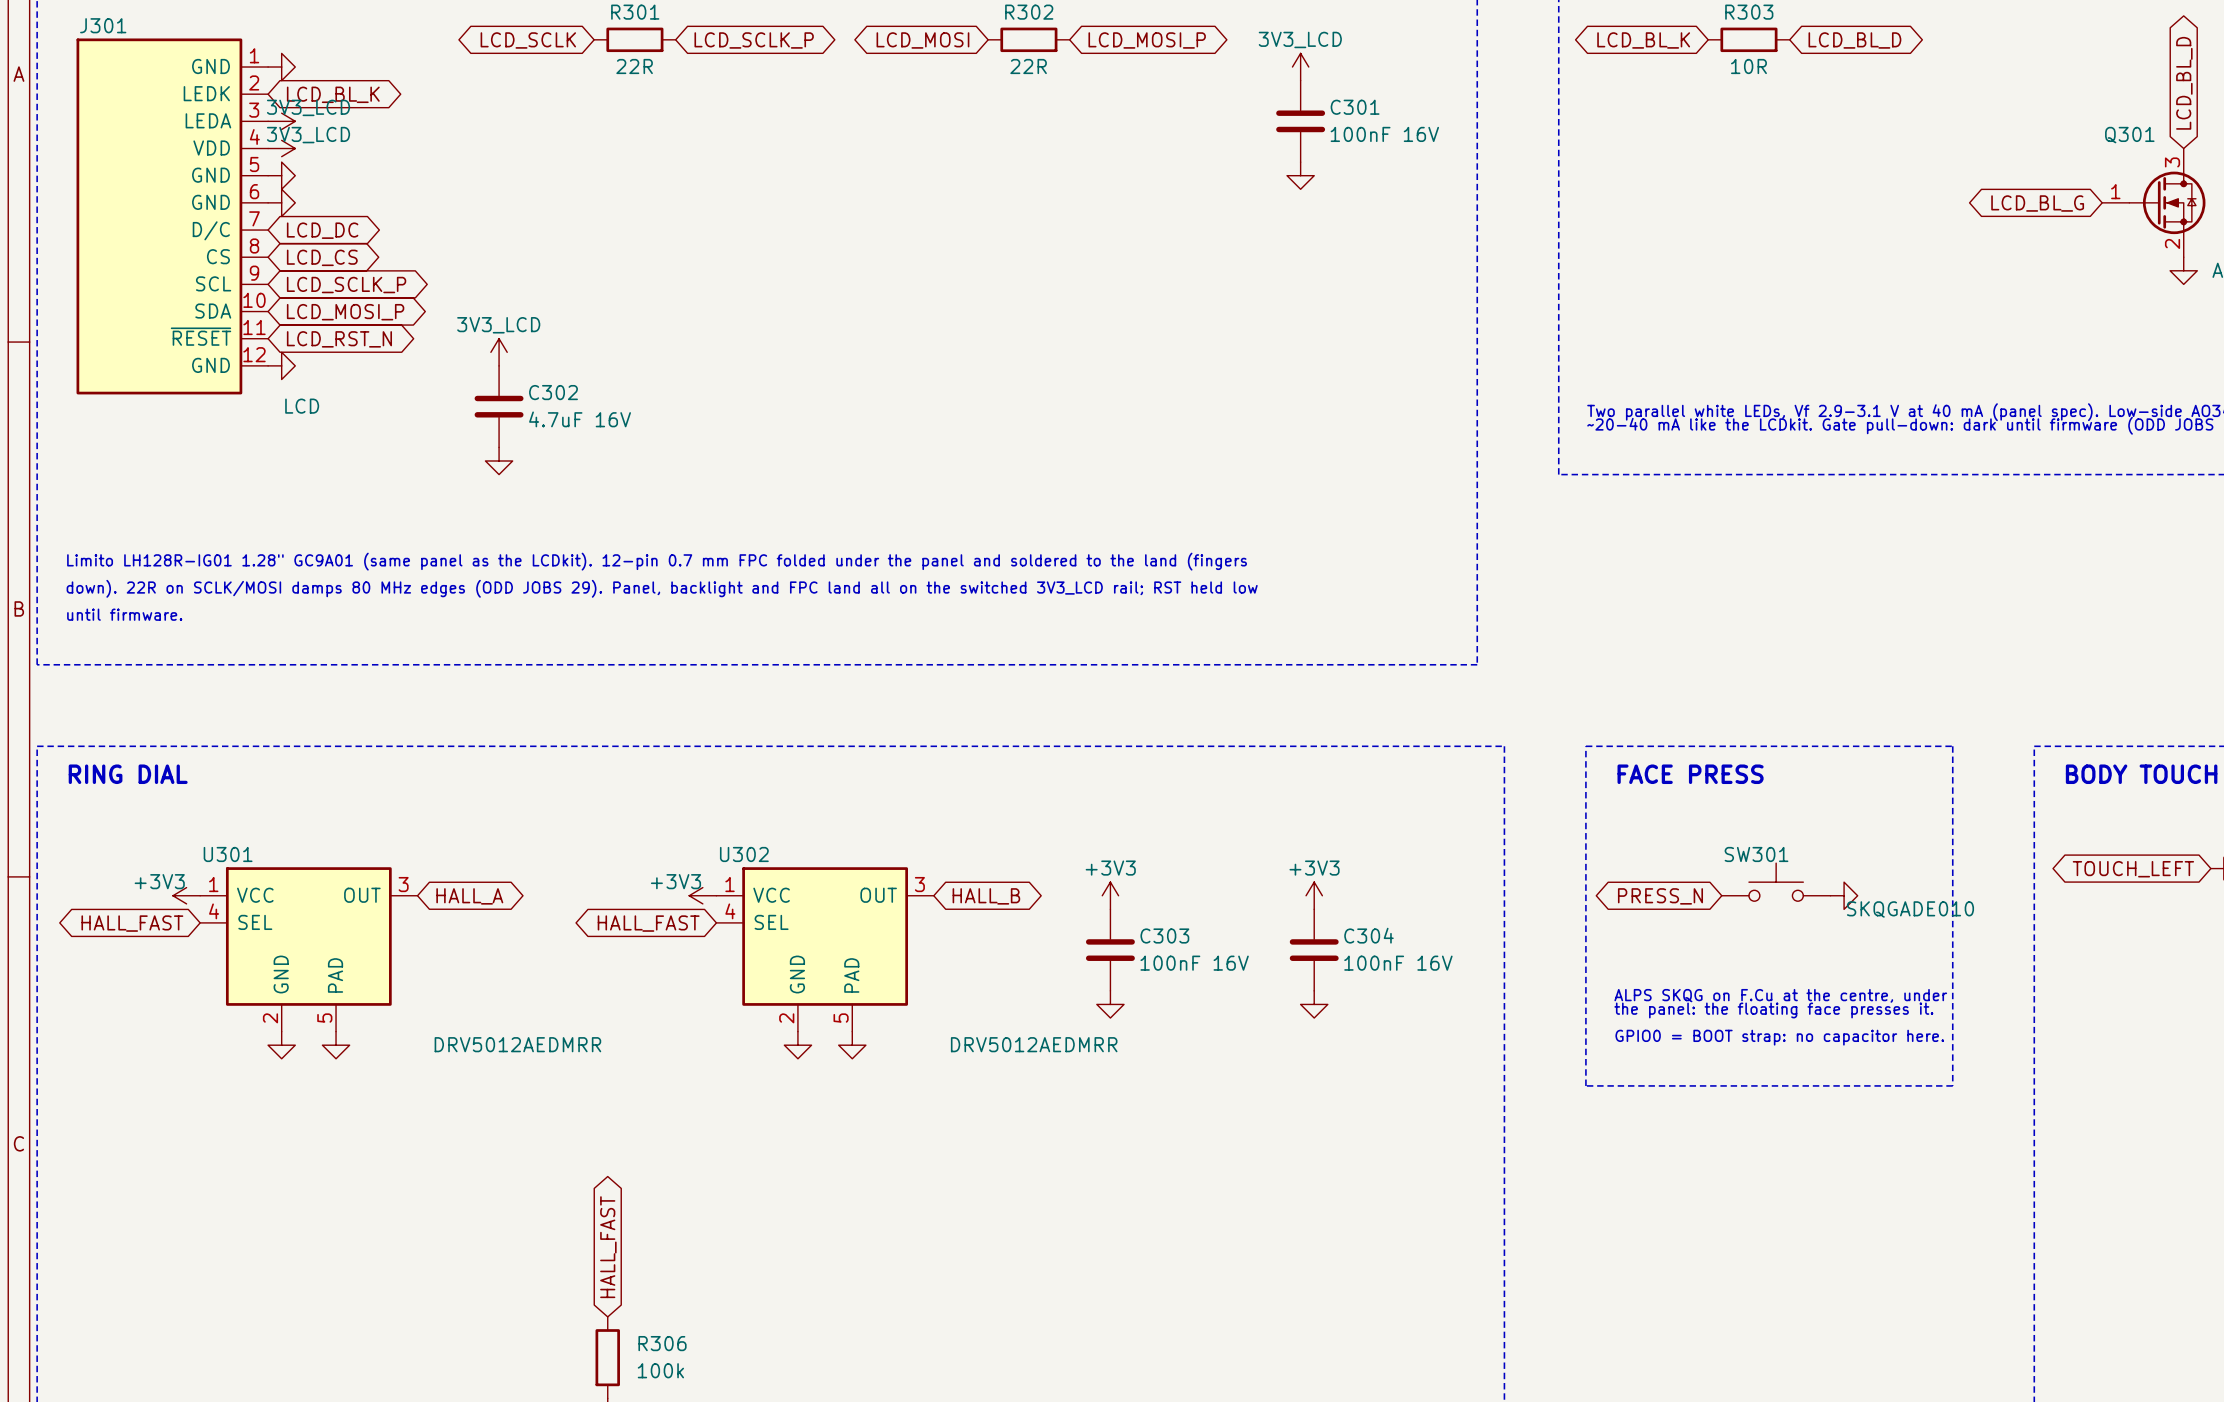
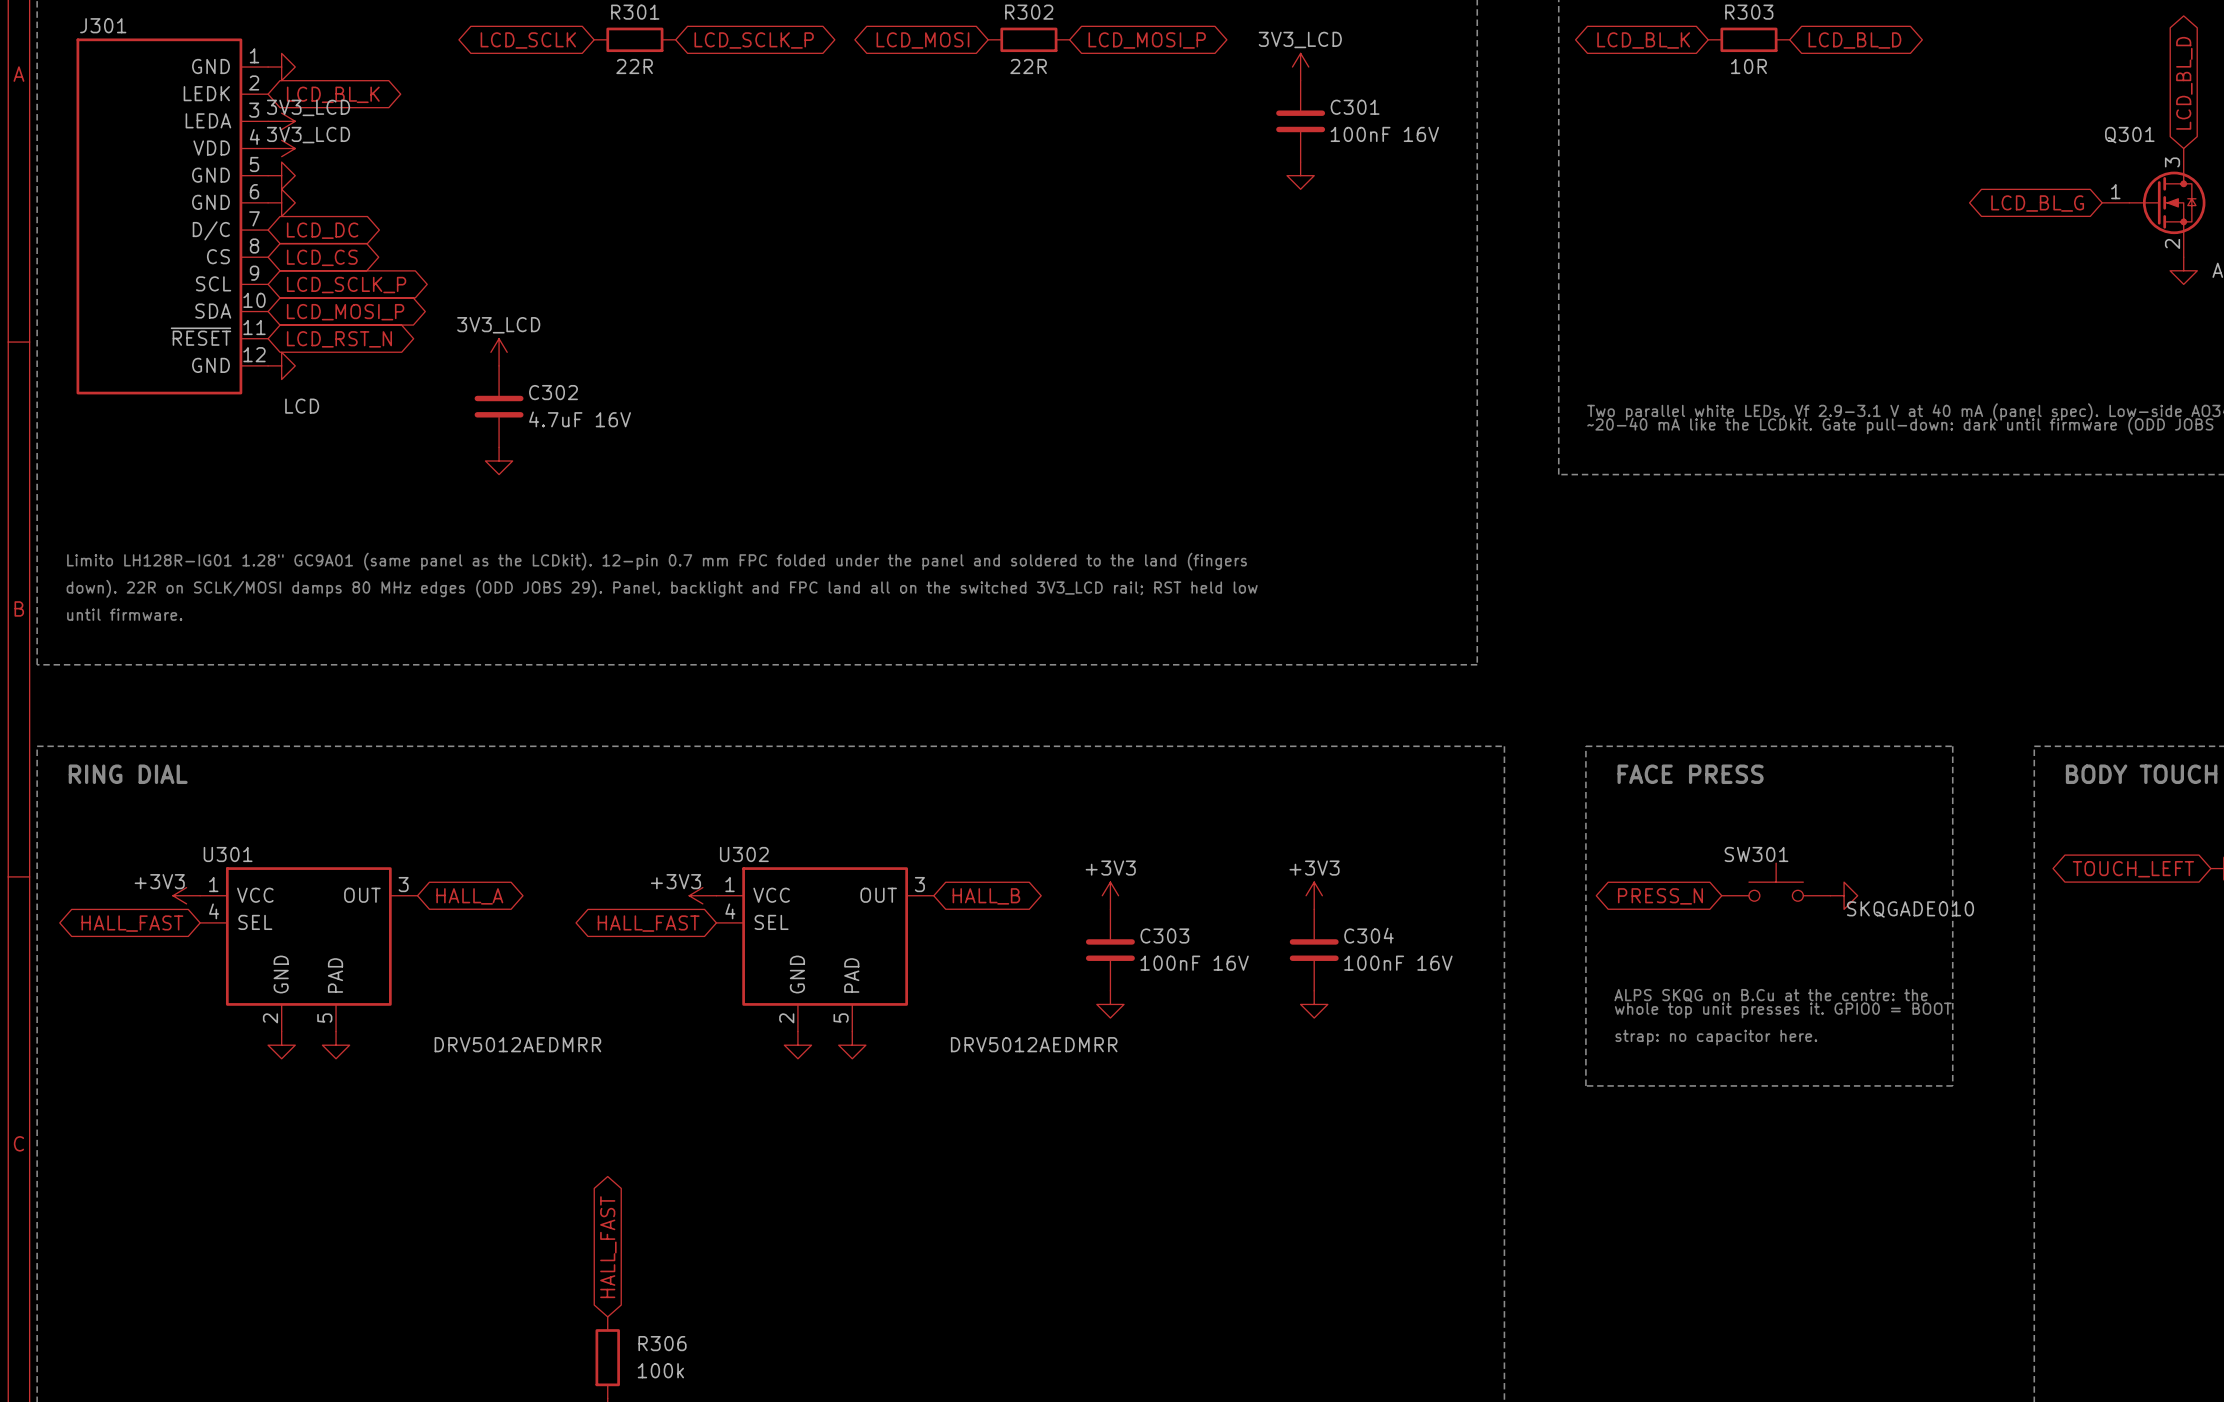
text: ALPS SKQG on F.Cu at the centre, under (1780, 995) -> ALPS SKQG on B.Cu at the centre: the (1771, 995)
text: the panel: the floating face presses it. (1773, 1010) -> whole top unit presses it. GPIO0 = BOOT (1783, 1010)
text: GPIO0 = BOOT strap: no capacitor here. (1779, 1037) -> strap: no capacitor here. (1716, 1037)

